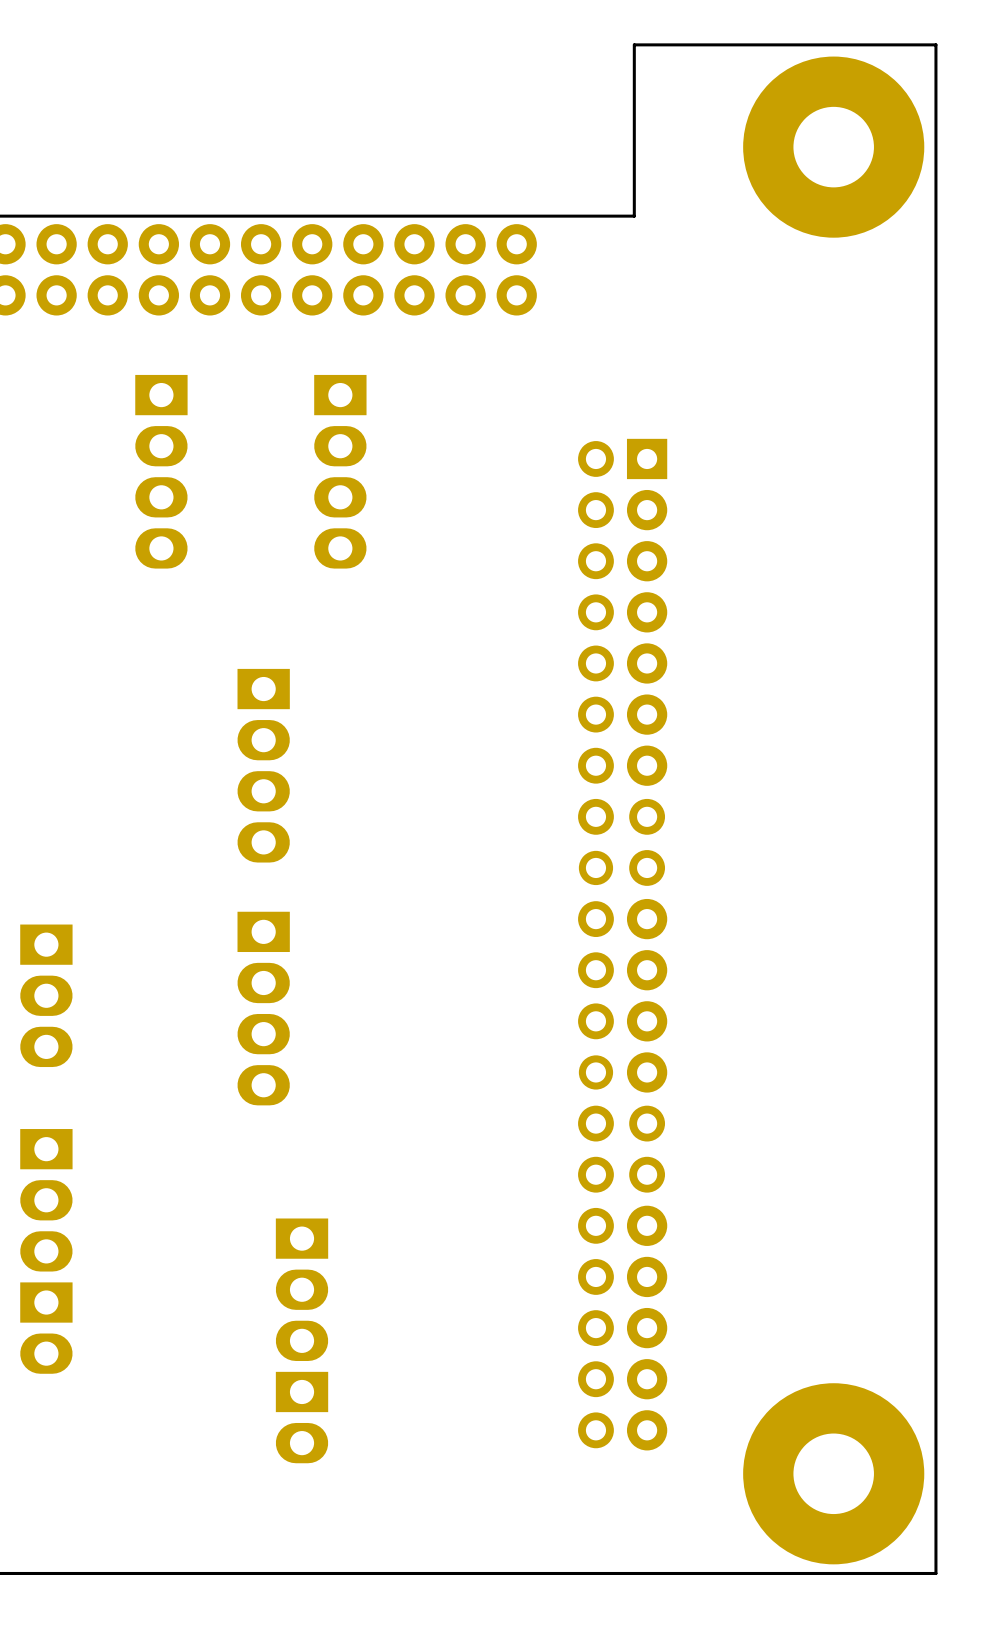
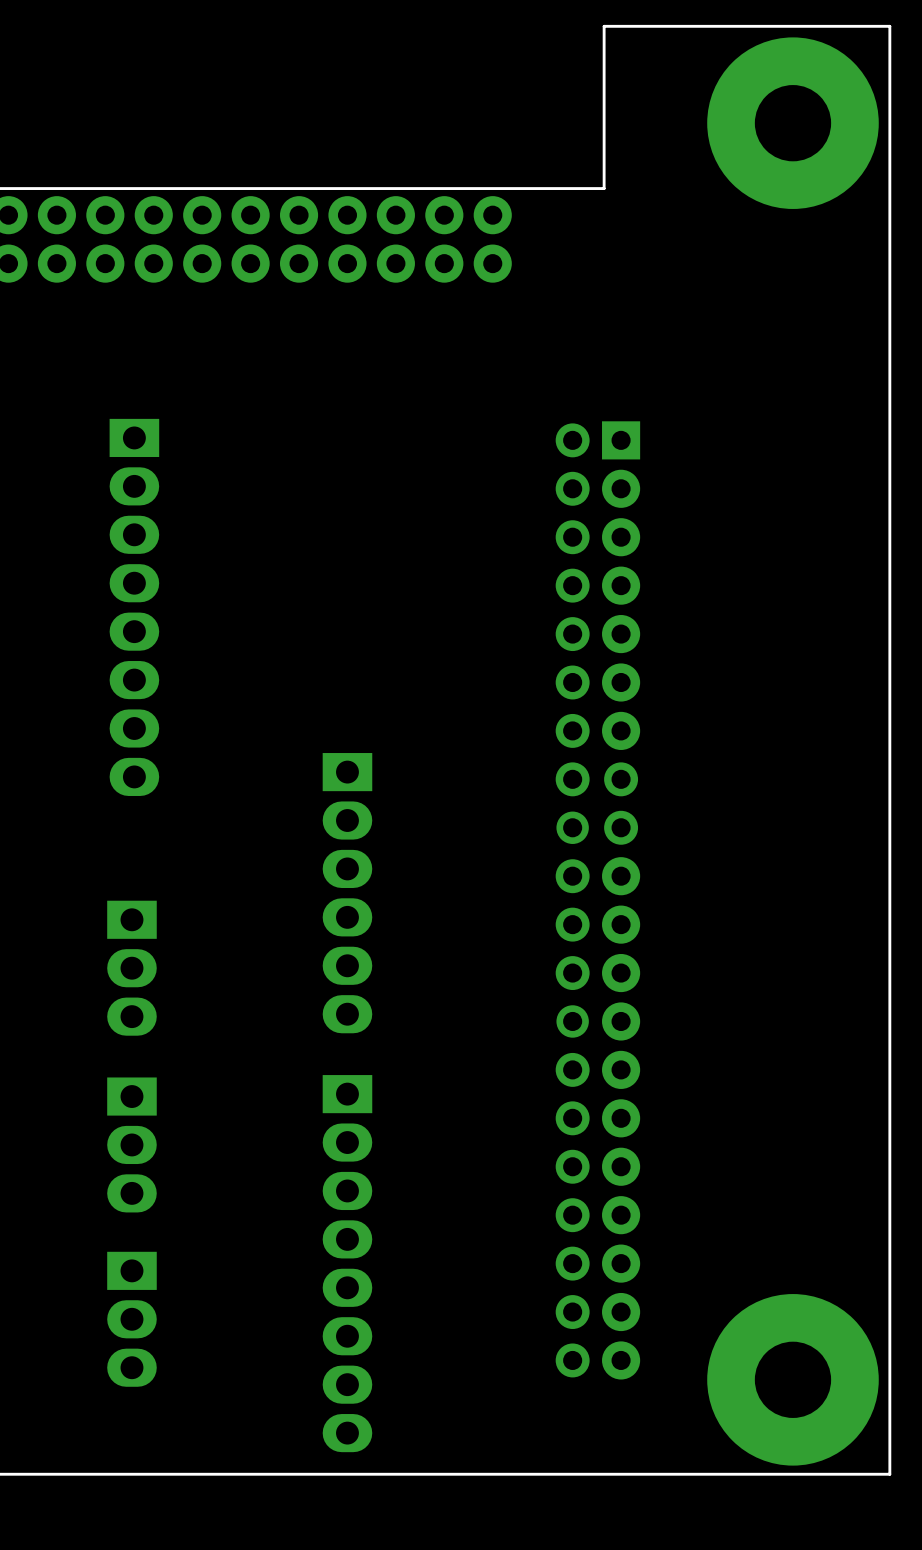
part: (161, 471) -> none
part: (340, 471) -> none
part: none -> (134, 607)
part: (263, 765) -> none
part: (622, 944) -> none
part: none -> (347, 893)
part: none -> (597, 900)
part: (46, 995) -> none
part: (263, 1008) -> none
part: none -> (131, 968)
part: (46, 1200) -> none
part: none -> (131, 1144)
part: (302, 1289) -> none
part: (46, 1328) -> none
part: none -> (347, 1263)
part: none -> (131, 1319)
part: (302, 1417) -> none

